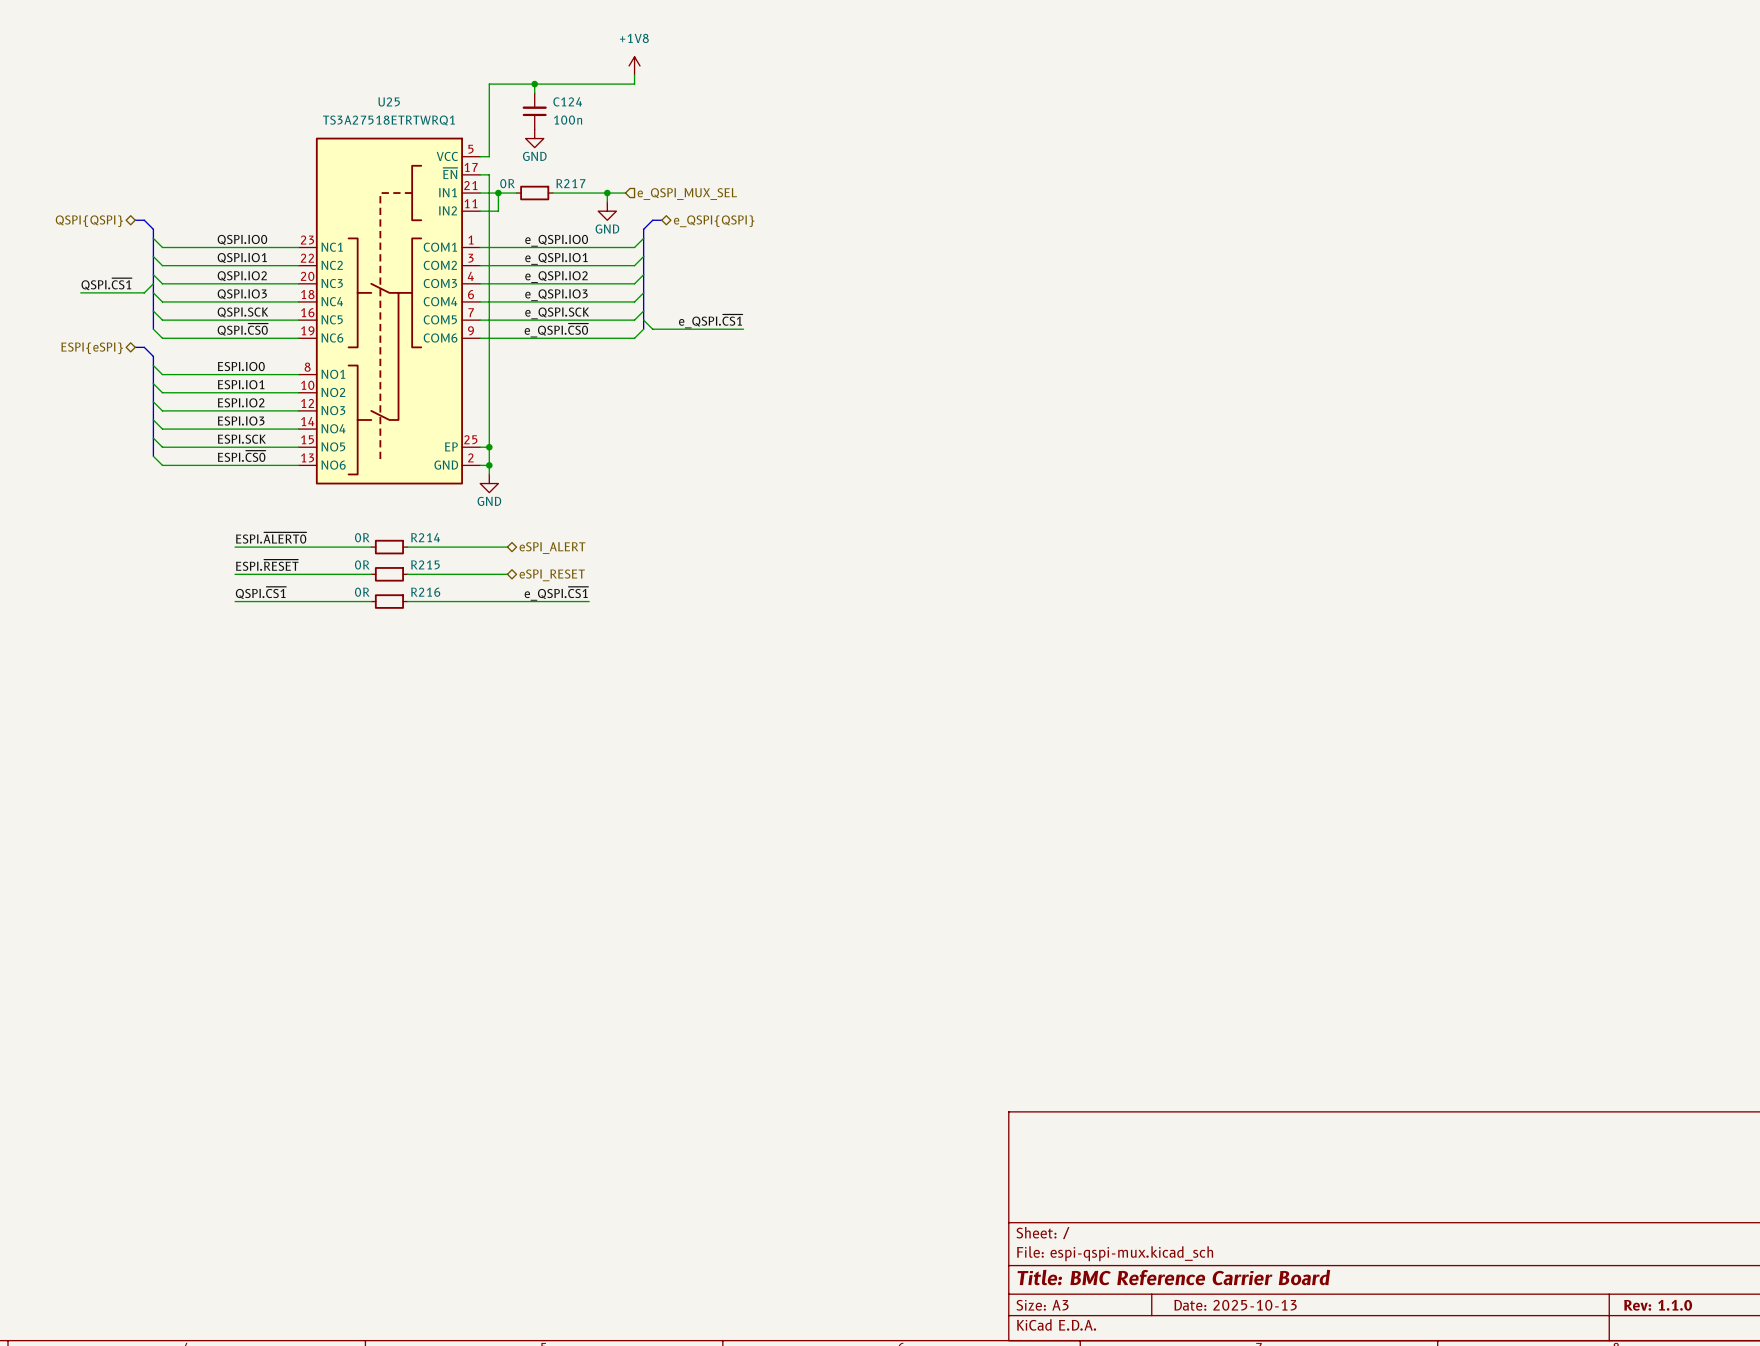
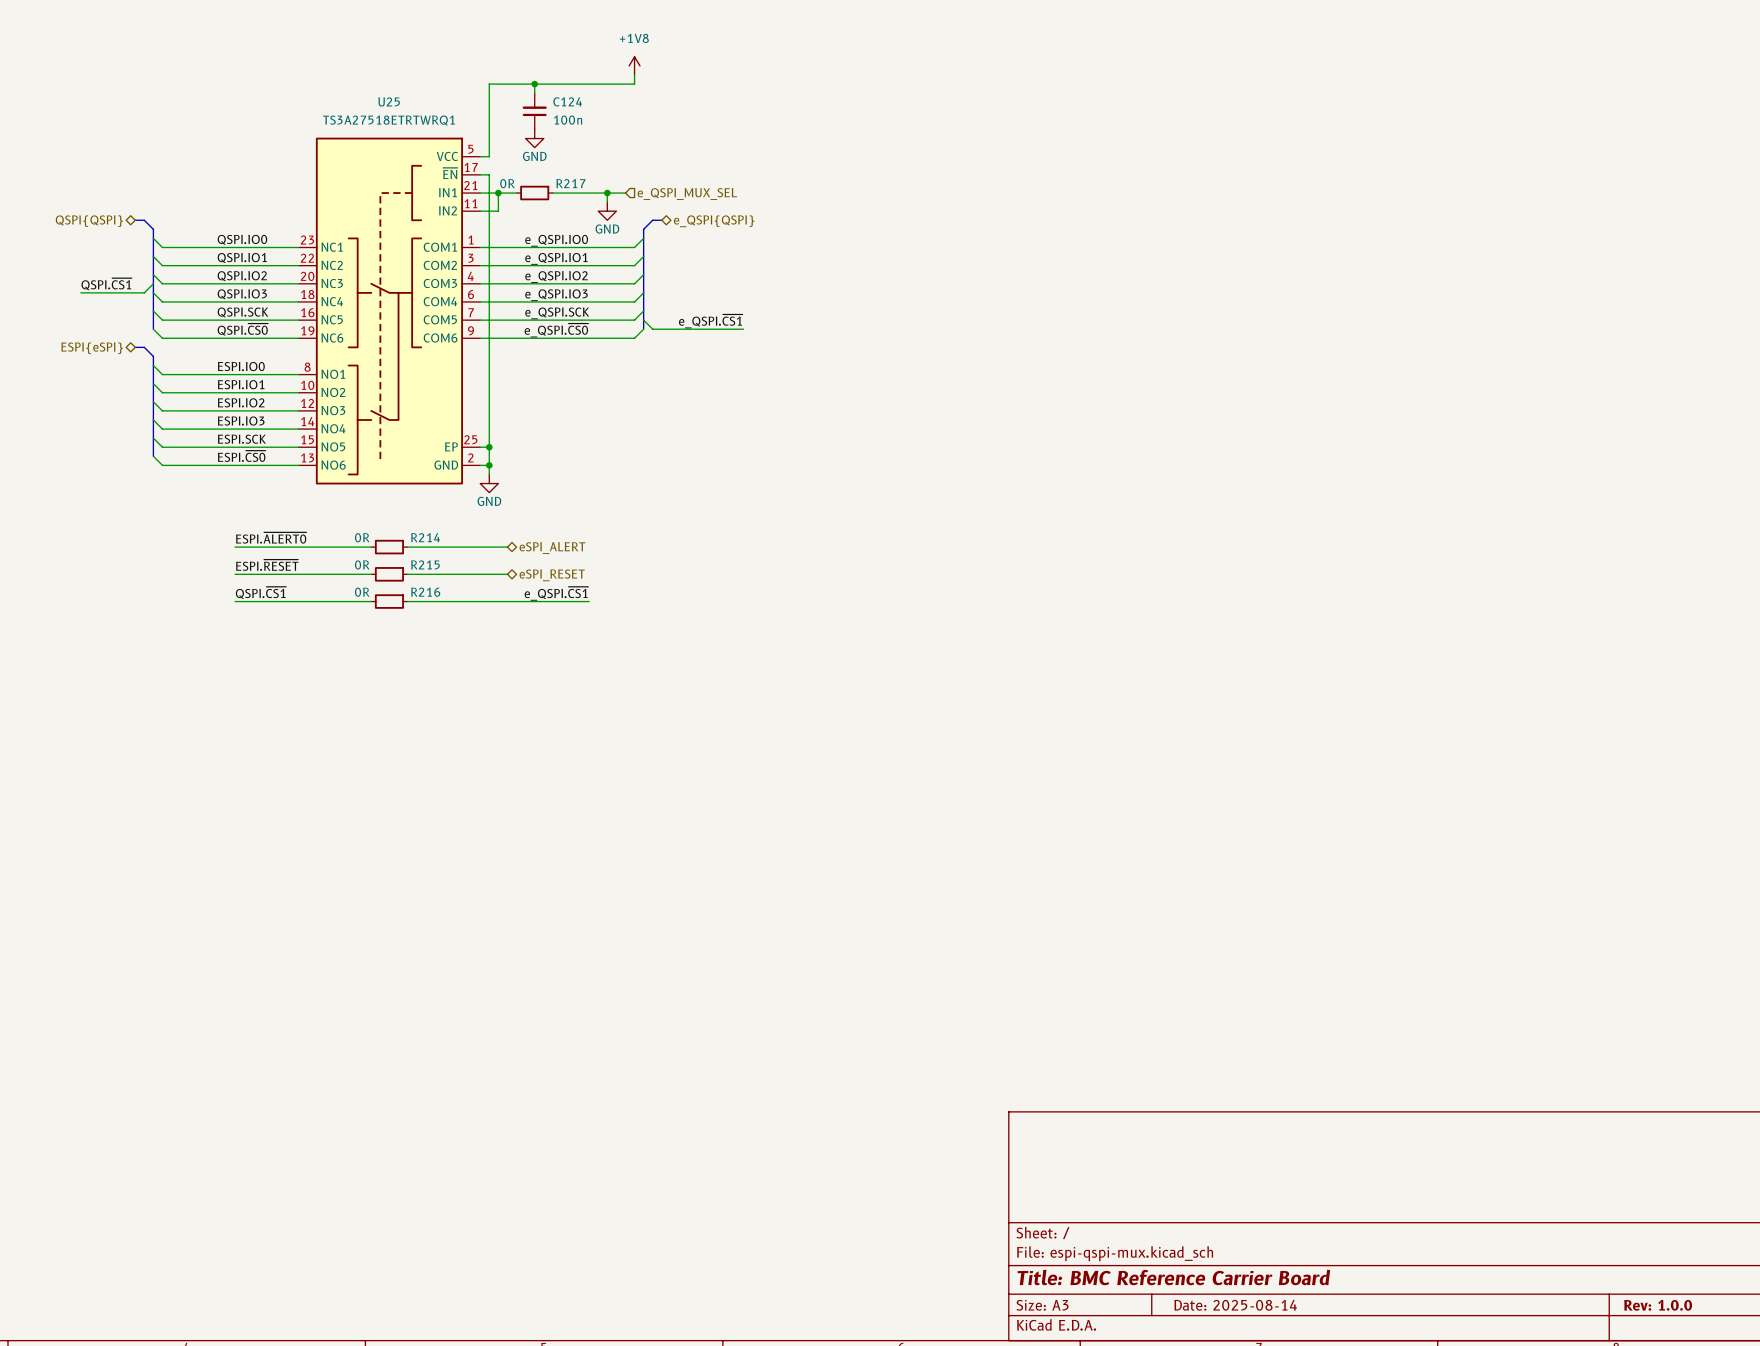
title block: Date: 2025-10-13 (1235, 1305) -> Date: 2025-08-14 (1235, 1305)
title block: Rev: 1.1.0 (1658, 1305) -> Rev: 1.0.0 (1658, 1305)

